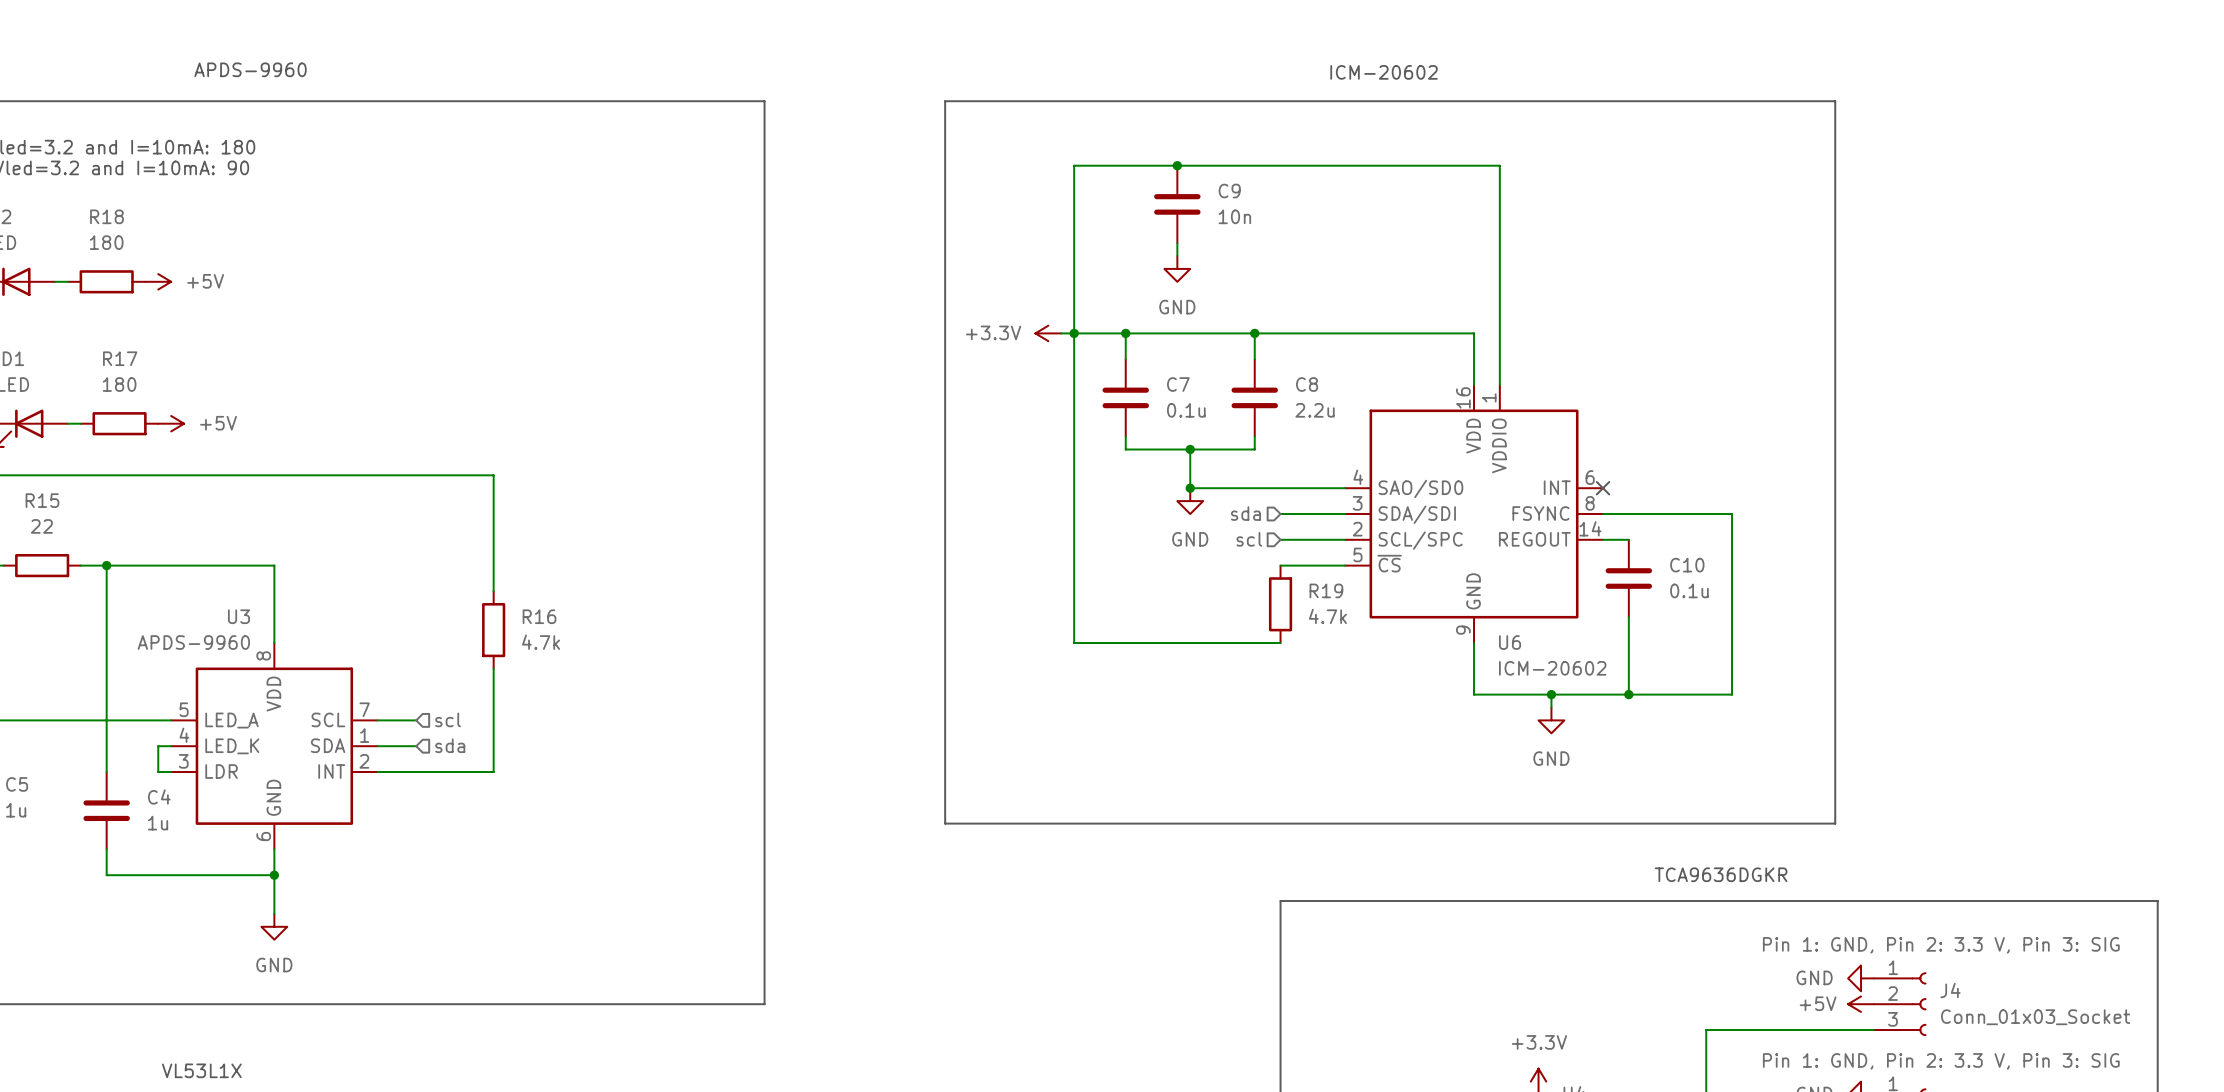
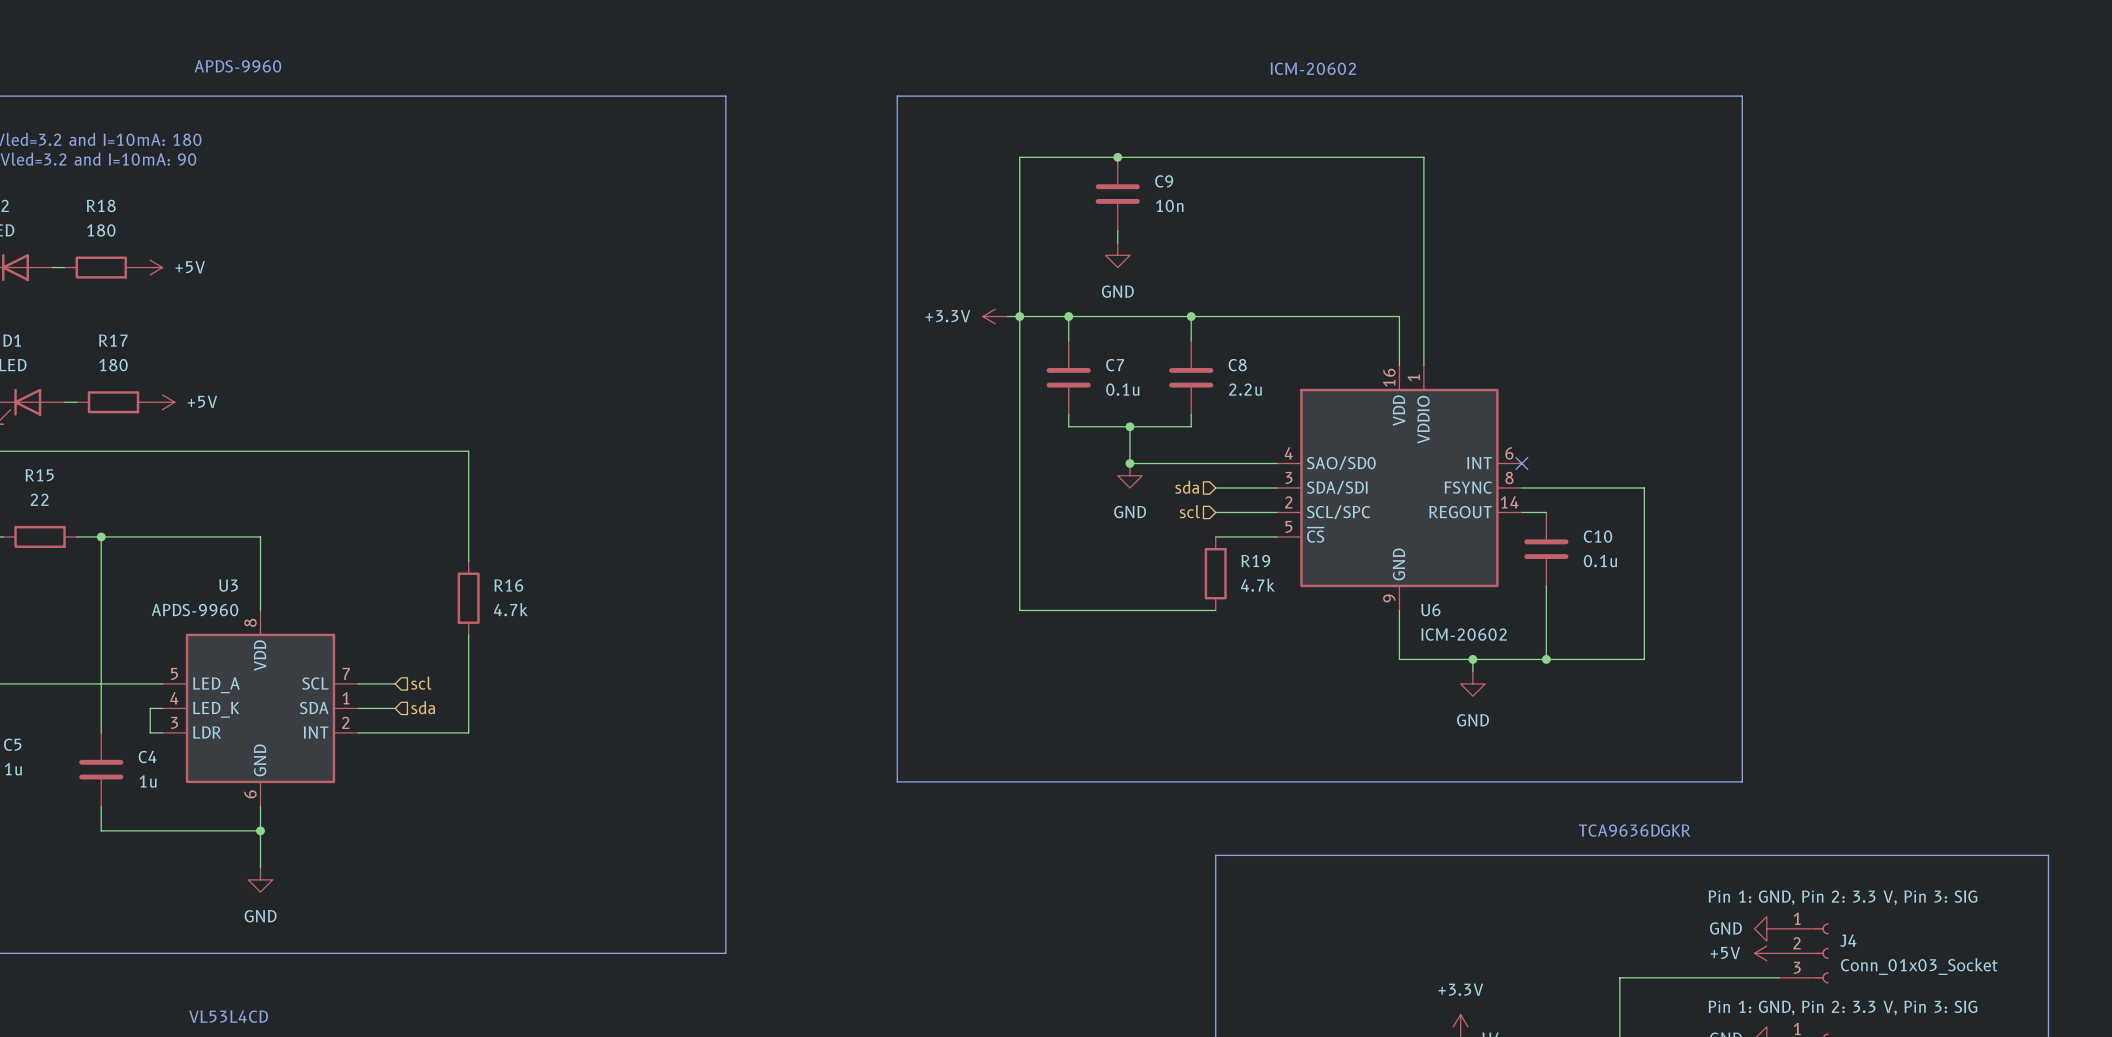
text: VL53L1X (201, 1070) -> VL53L4CD (228, 1016)

